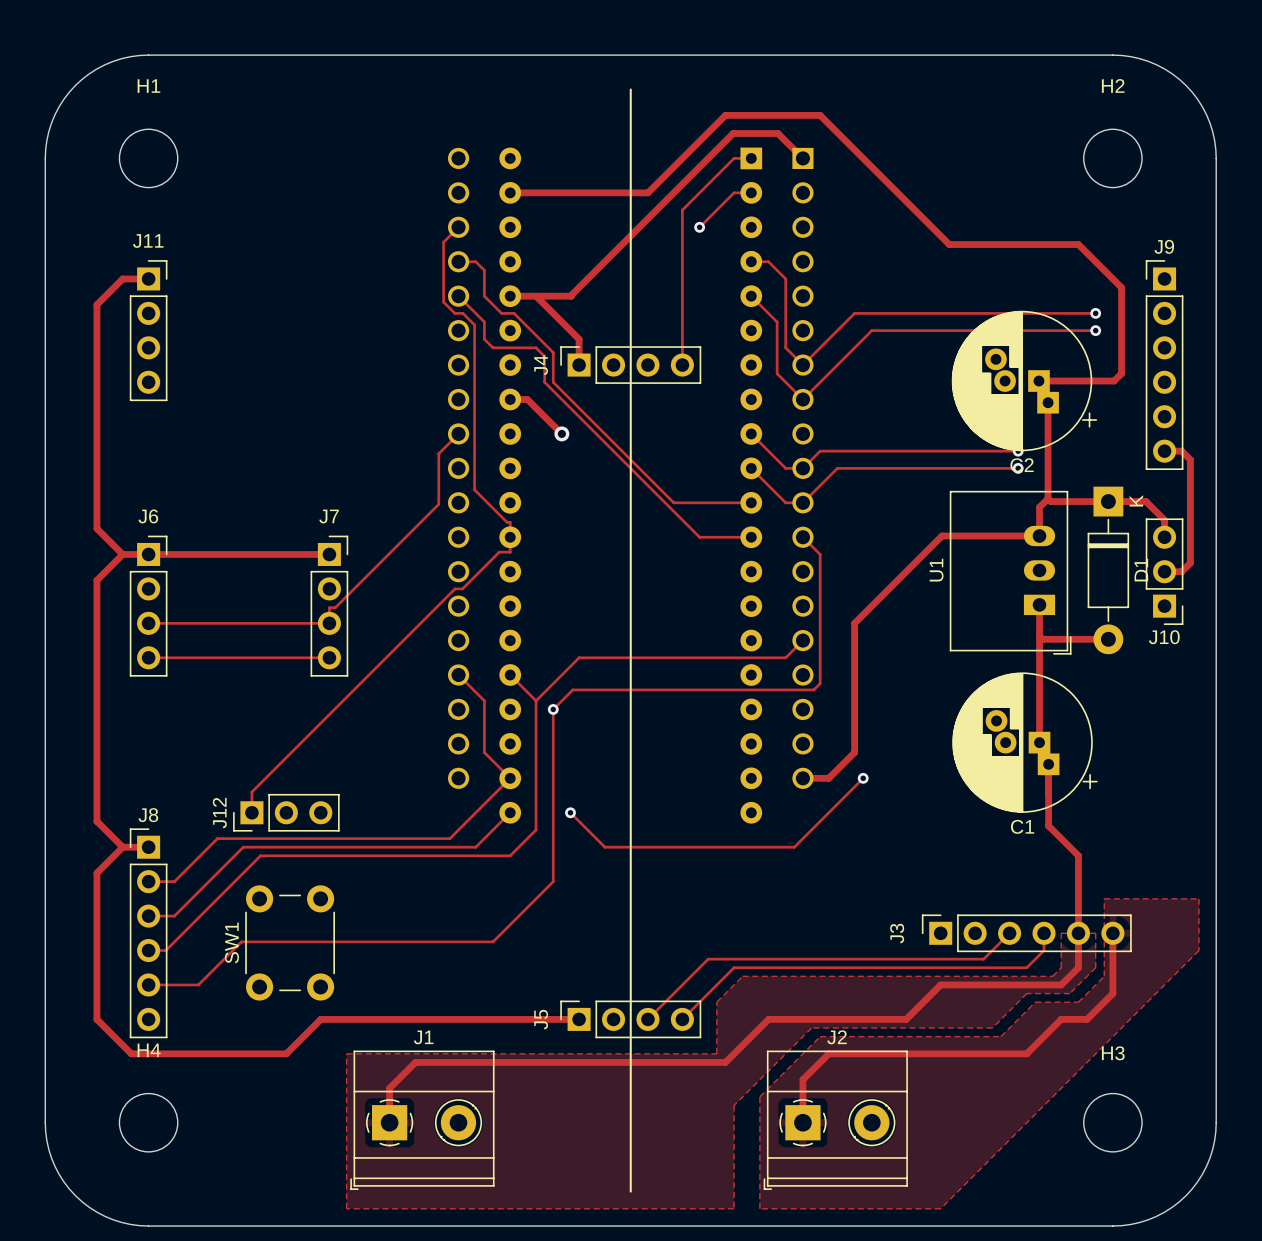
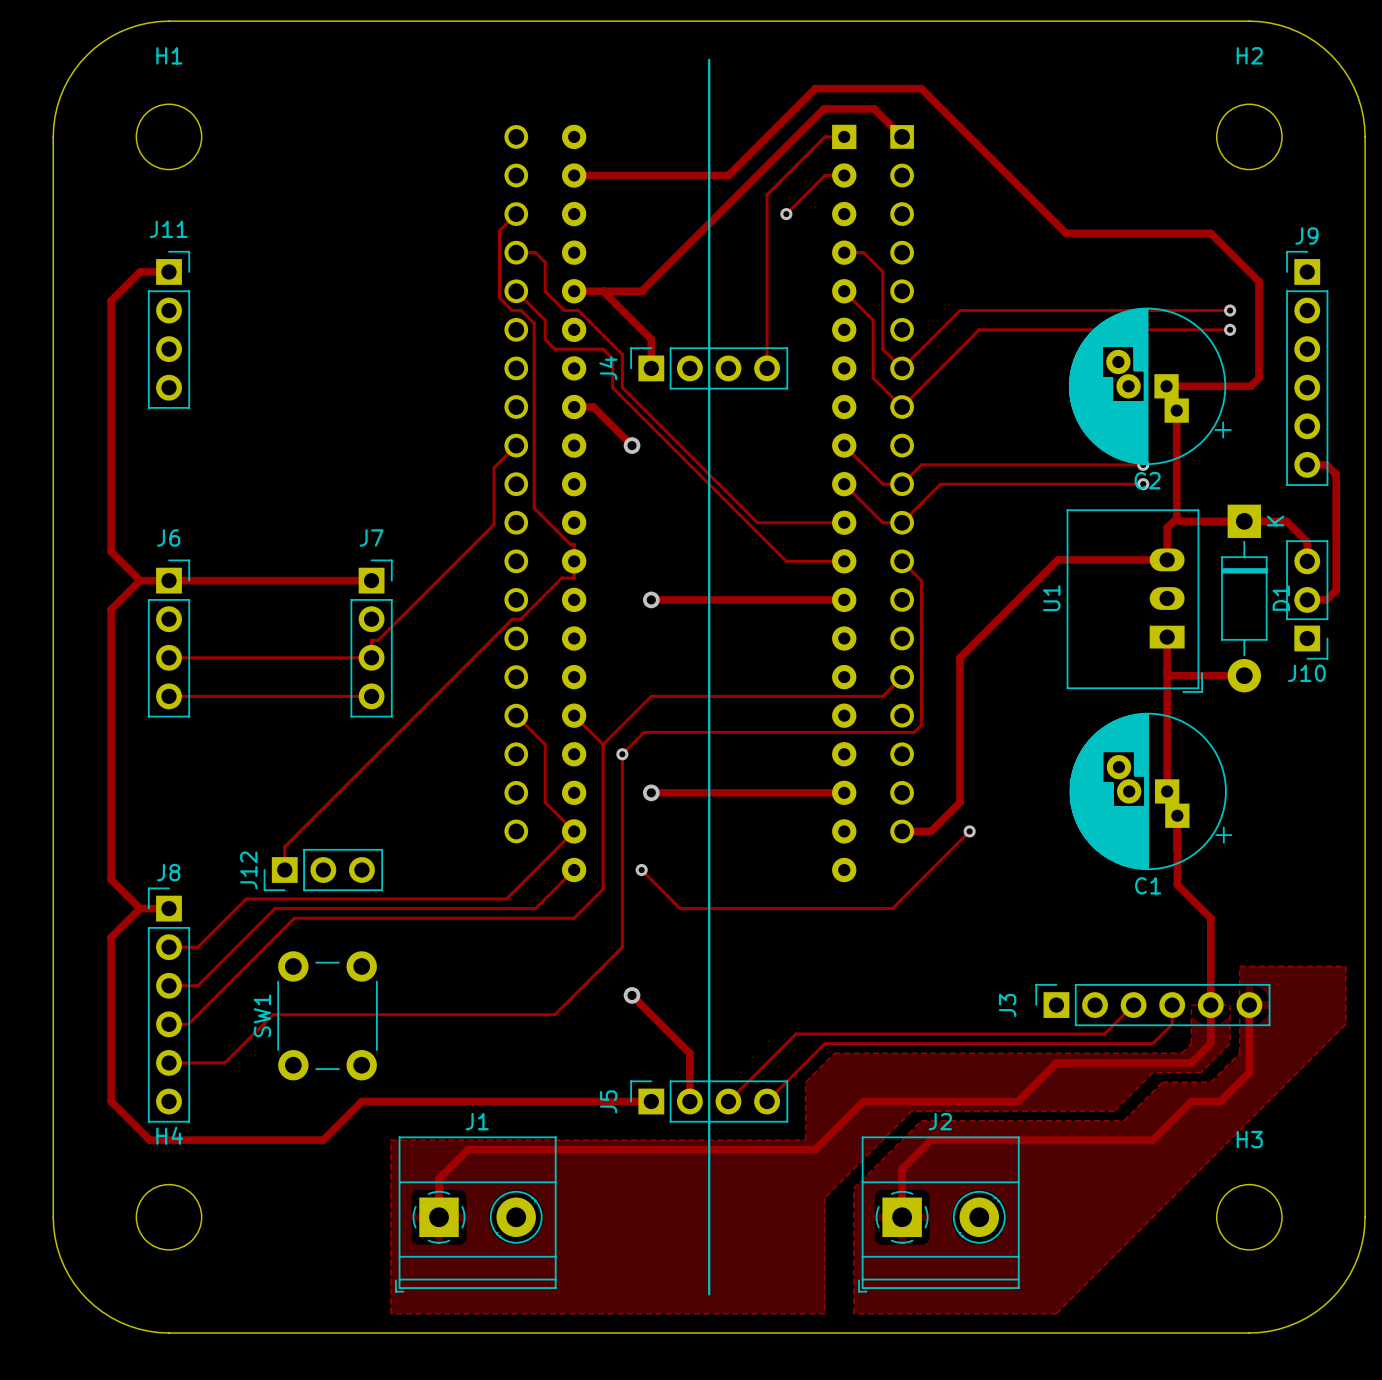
track: none -> (651, 599) (844, 599)
via: none -> (651, 599)
track: none -> (651, 792) (844, 792)
via: none -> (651, 792)
track: none -> (632, 995) (689, 1053) (689, 1101)
via: none -> (632, 995)

